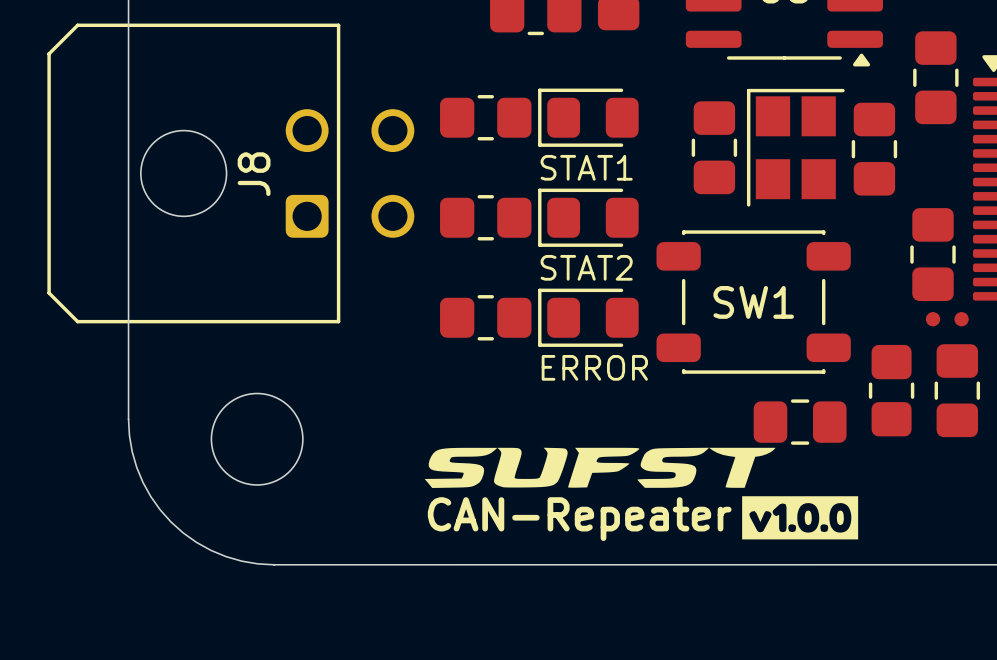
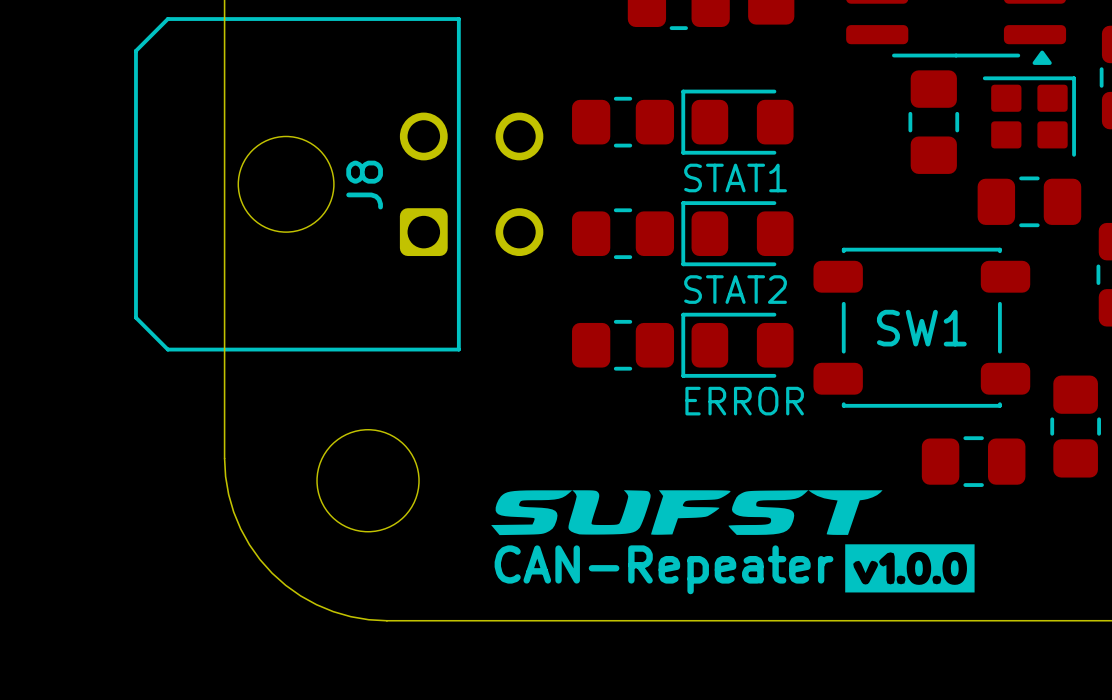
part: none -> (1029, 116)
part: none -> (933, 122)
part: (714, 147) -> none
part: (795, 147) -> none
part rotation: 0° (874, 149) -> 90° clockwise (1029, 201)
drawing position: (600, 467) -> (686, 512)
drawing position: (800, 517) -> (909, 568)
text position: CAN-Repeater (579, 519) -> CAN-Repeater (664, 569)

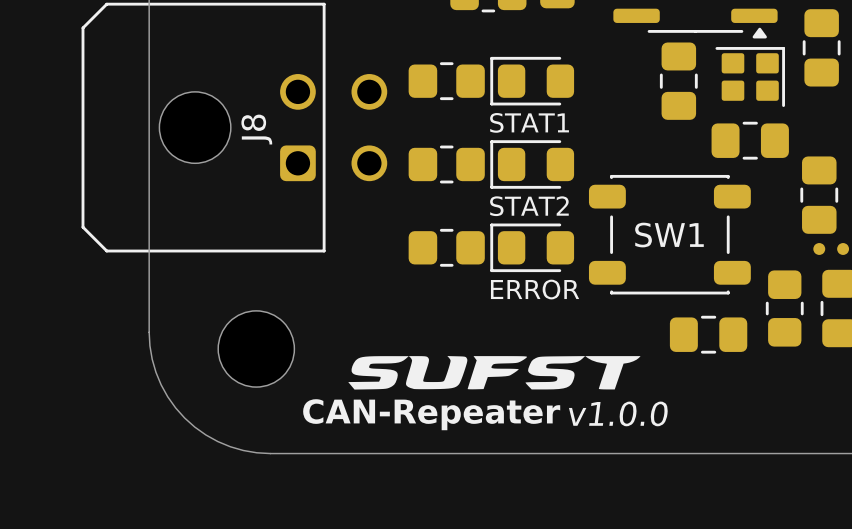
drawing: [845, 544, 975, 593] -> none
text: none -> v1.0.0 (618, 413)
text position: CAN-Repeater (664, 569) -> CAN-Repeater (431, 414)

